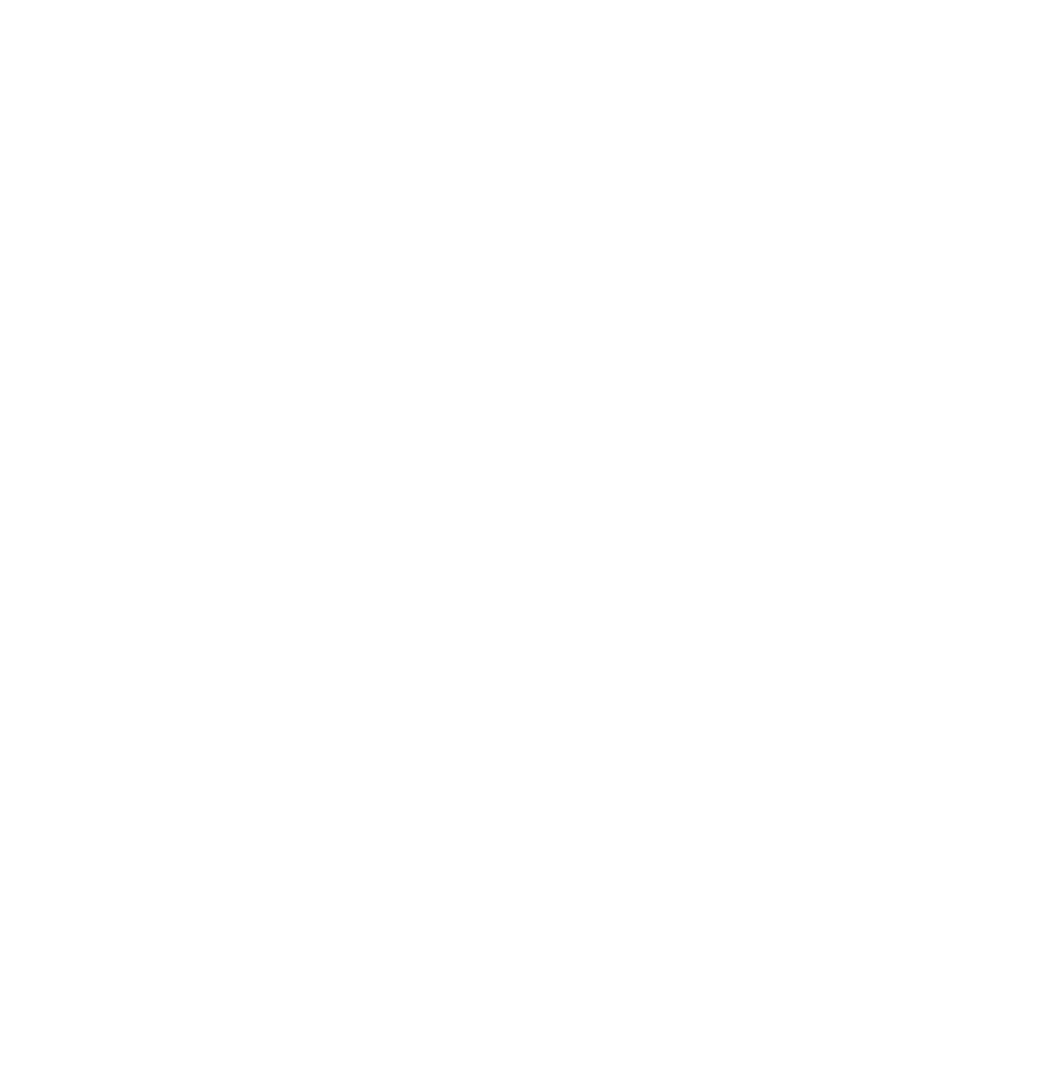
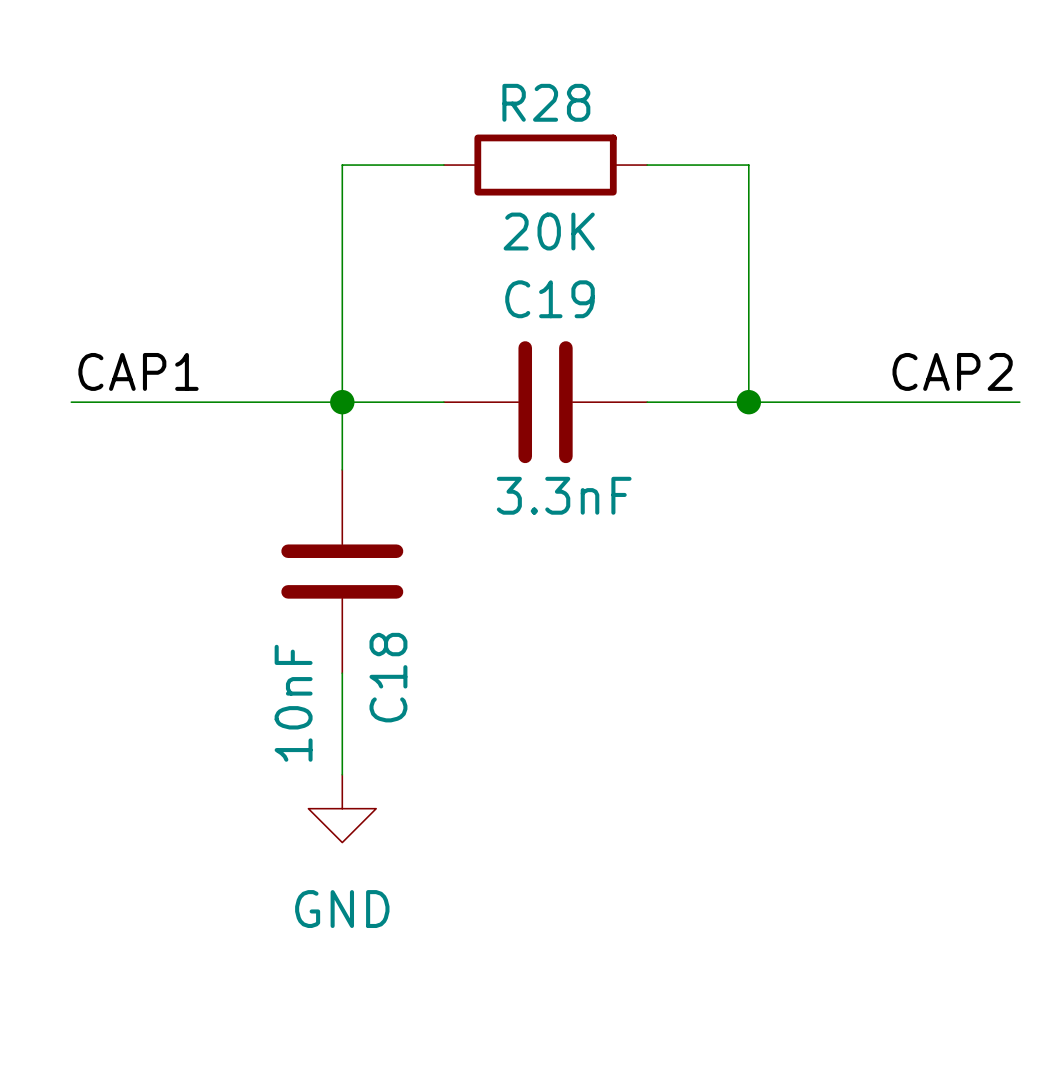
wire: none -> (443, 165) (342, 165) (342, 469)
R28: none -> 20K (545, 165)
wire: none -> (647, 165) (748, 165) (748, 402)
label: none -> CAP1 (138, 371)
label: none -> CAP2 (952, 371)
wire: none -> (71, 402) (443, 402)
junction: none -> (342, 402)
C19: none -> 3.3nF (545, 402)
wire: none -> (647, 402) (1019, 402)
junction: none -> (748, 402)
C18: none -> 10nF (342, 571)
wire: none -> (342, 673) (342, 774)
power symbol: none -> GND (342, 808)

